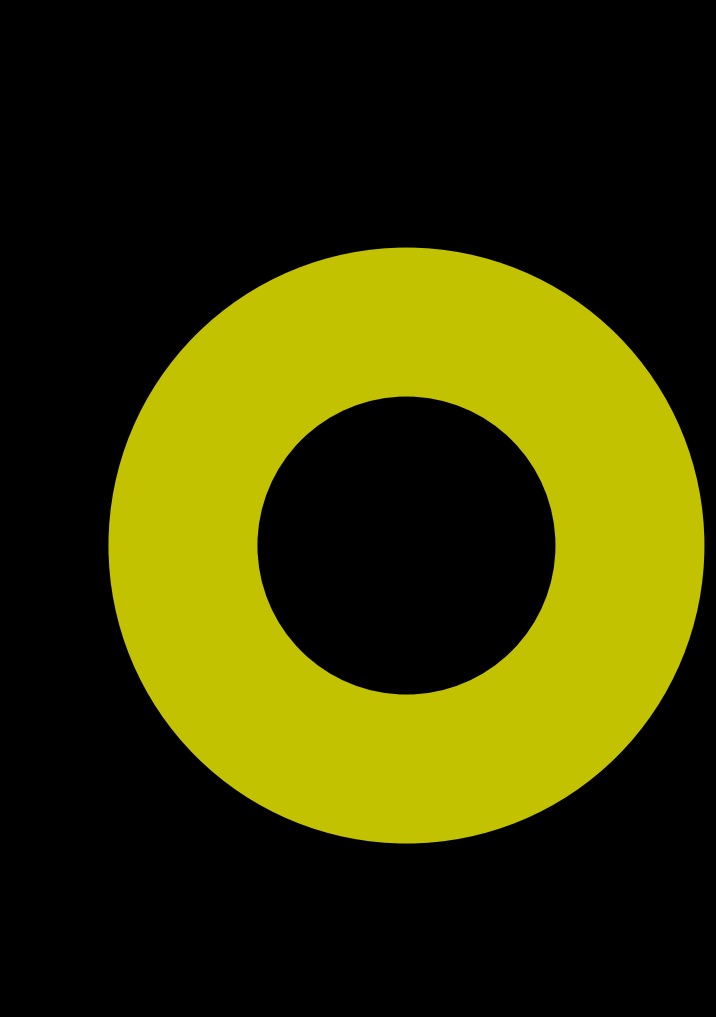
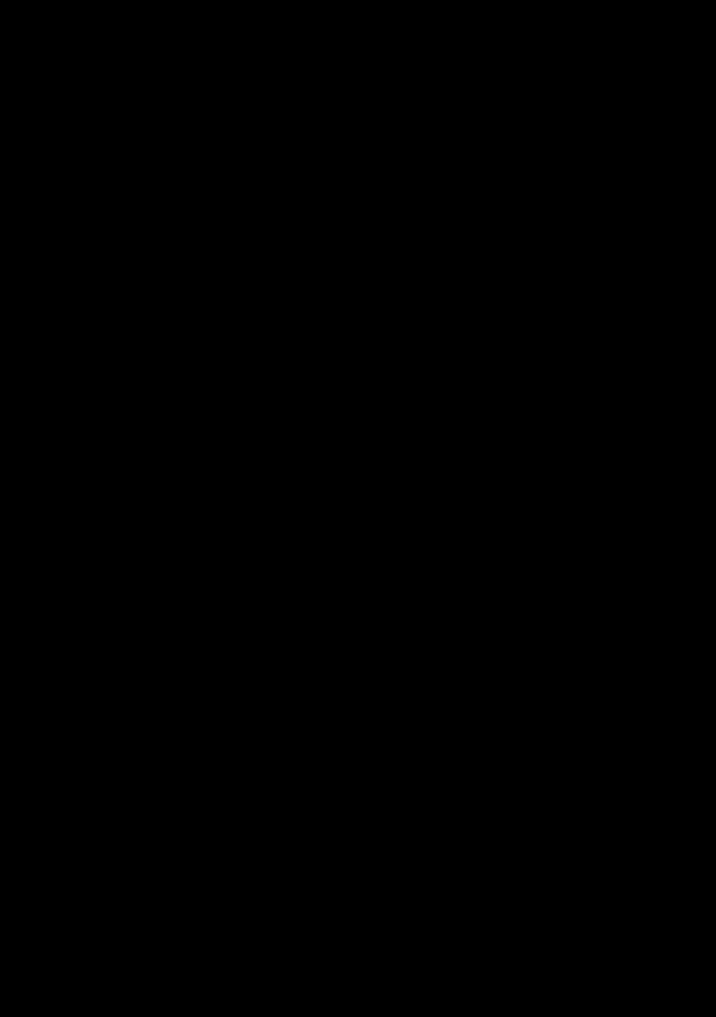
part: (406, 545) -> none

